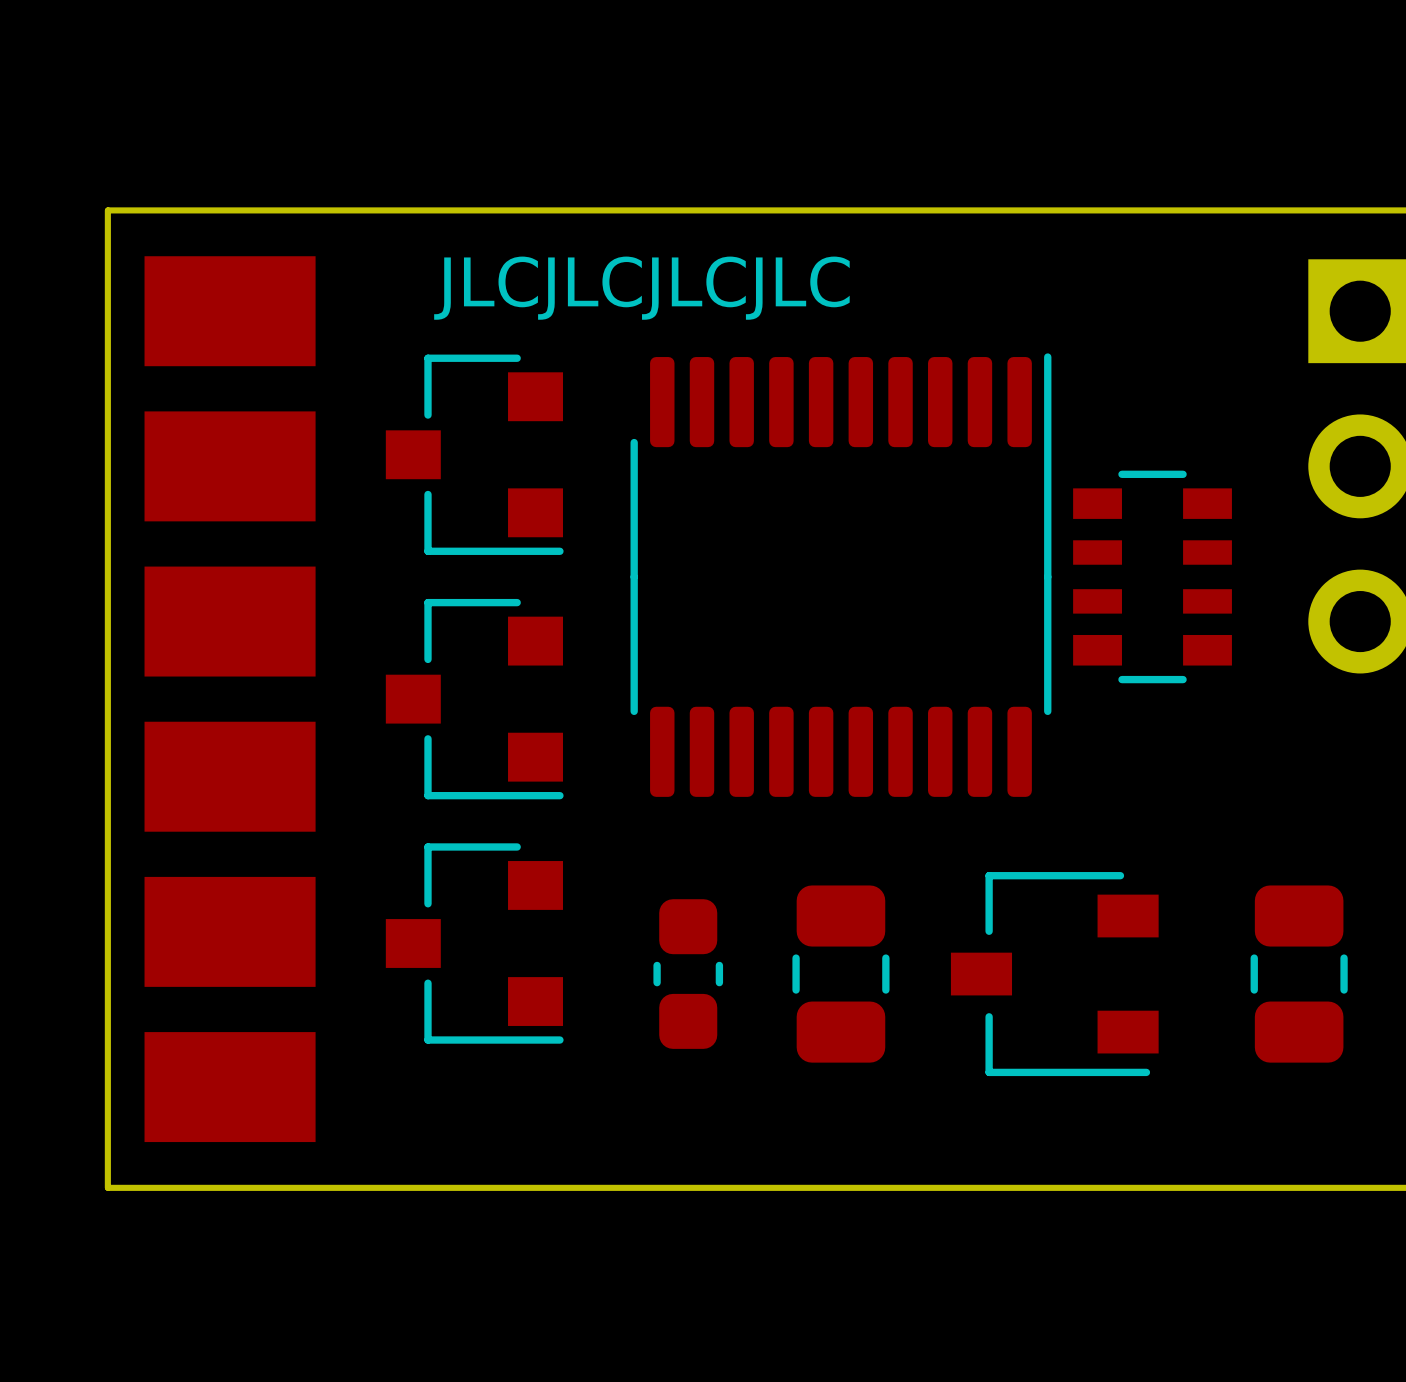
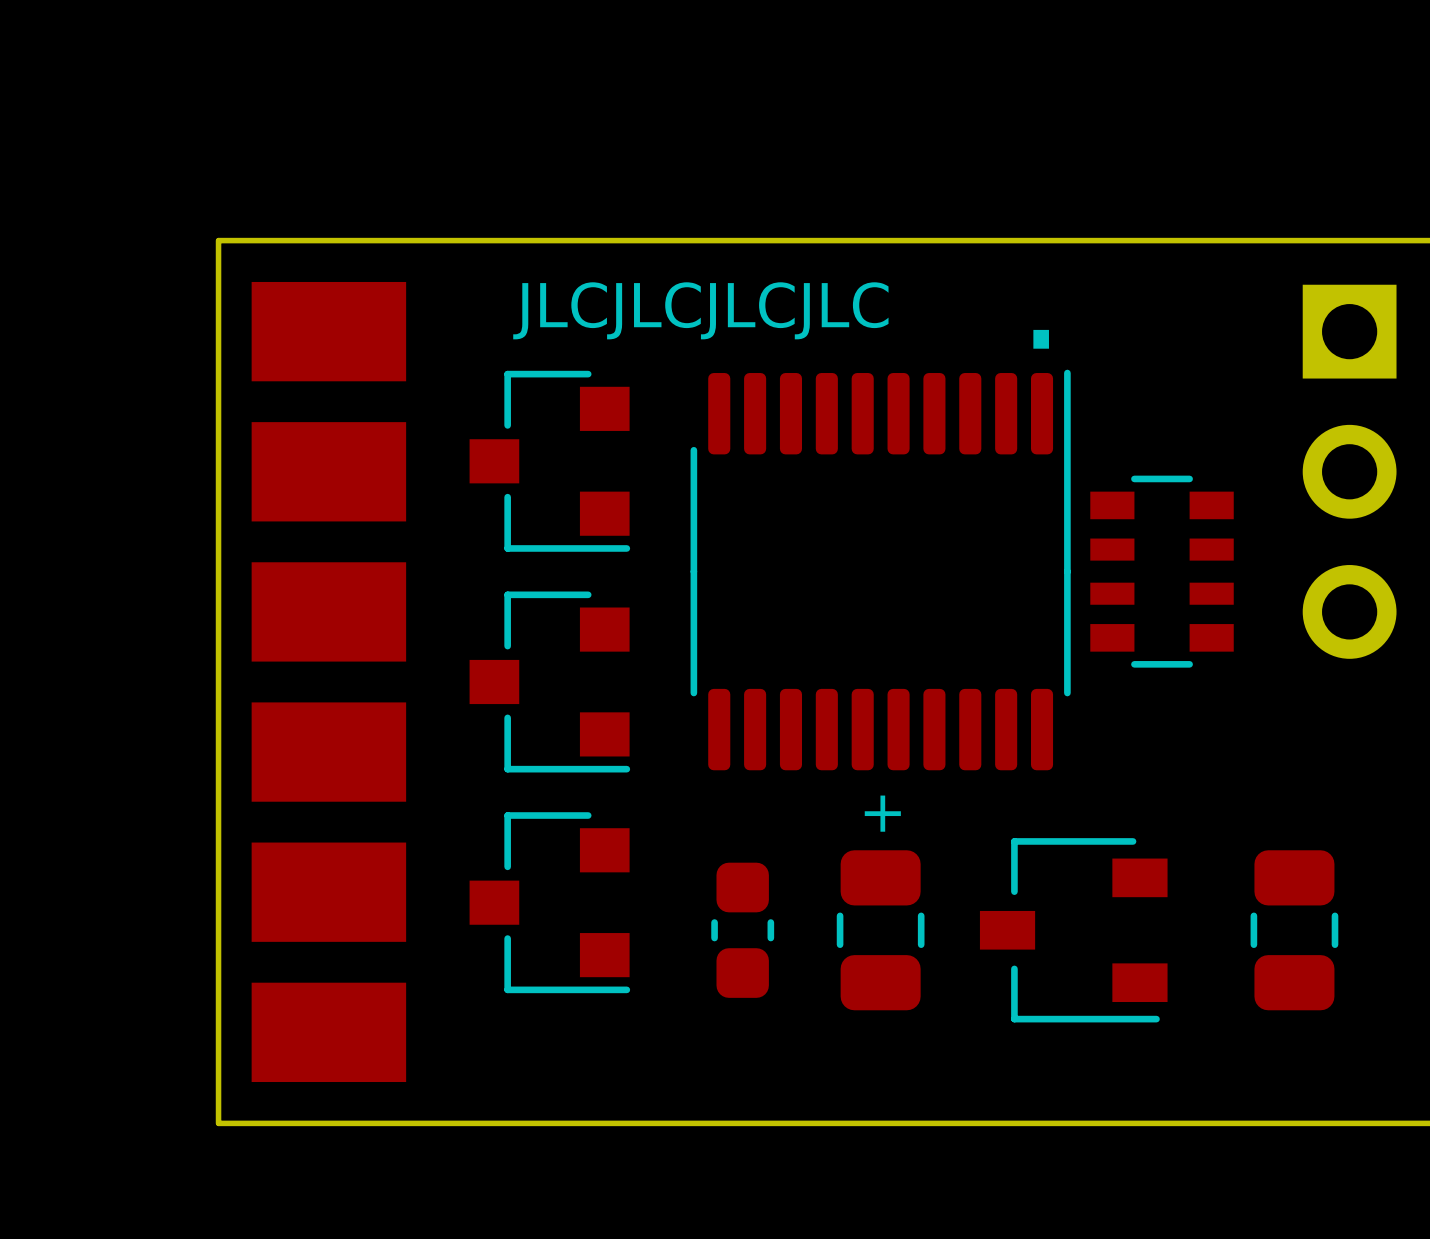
text: none -> . (1041, 339)
text: none -> + (882, 813)

